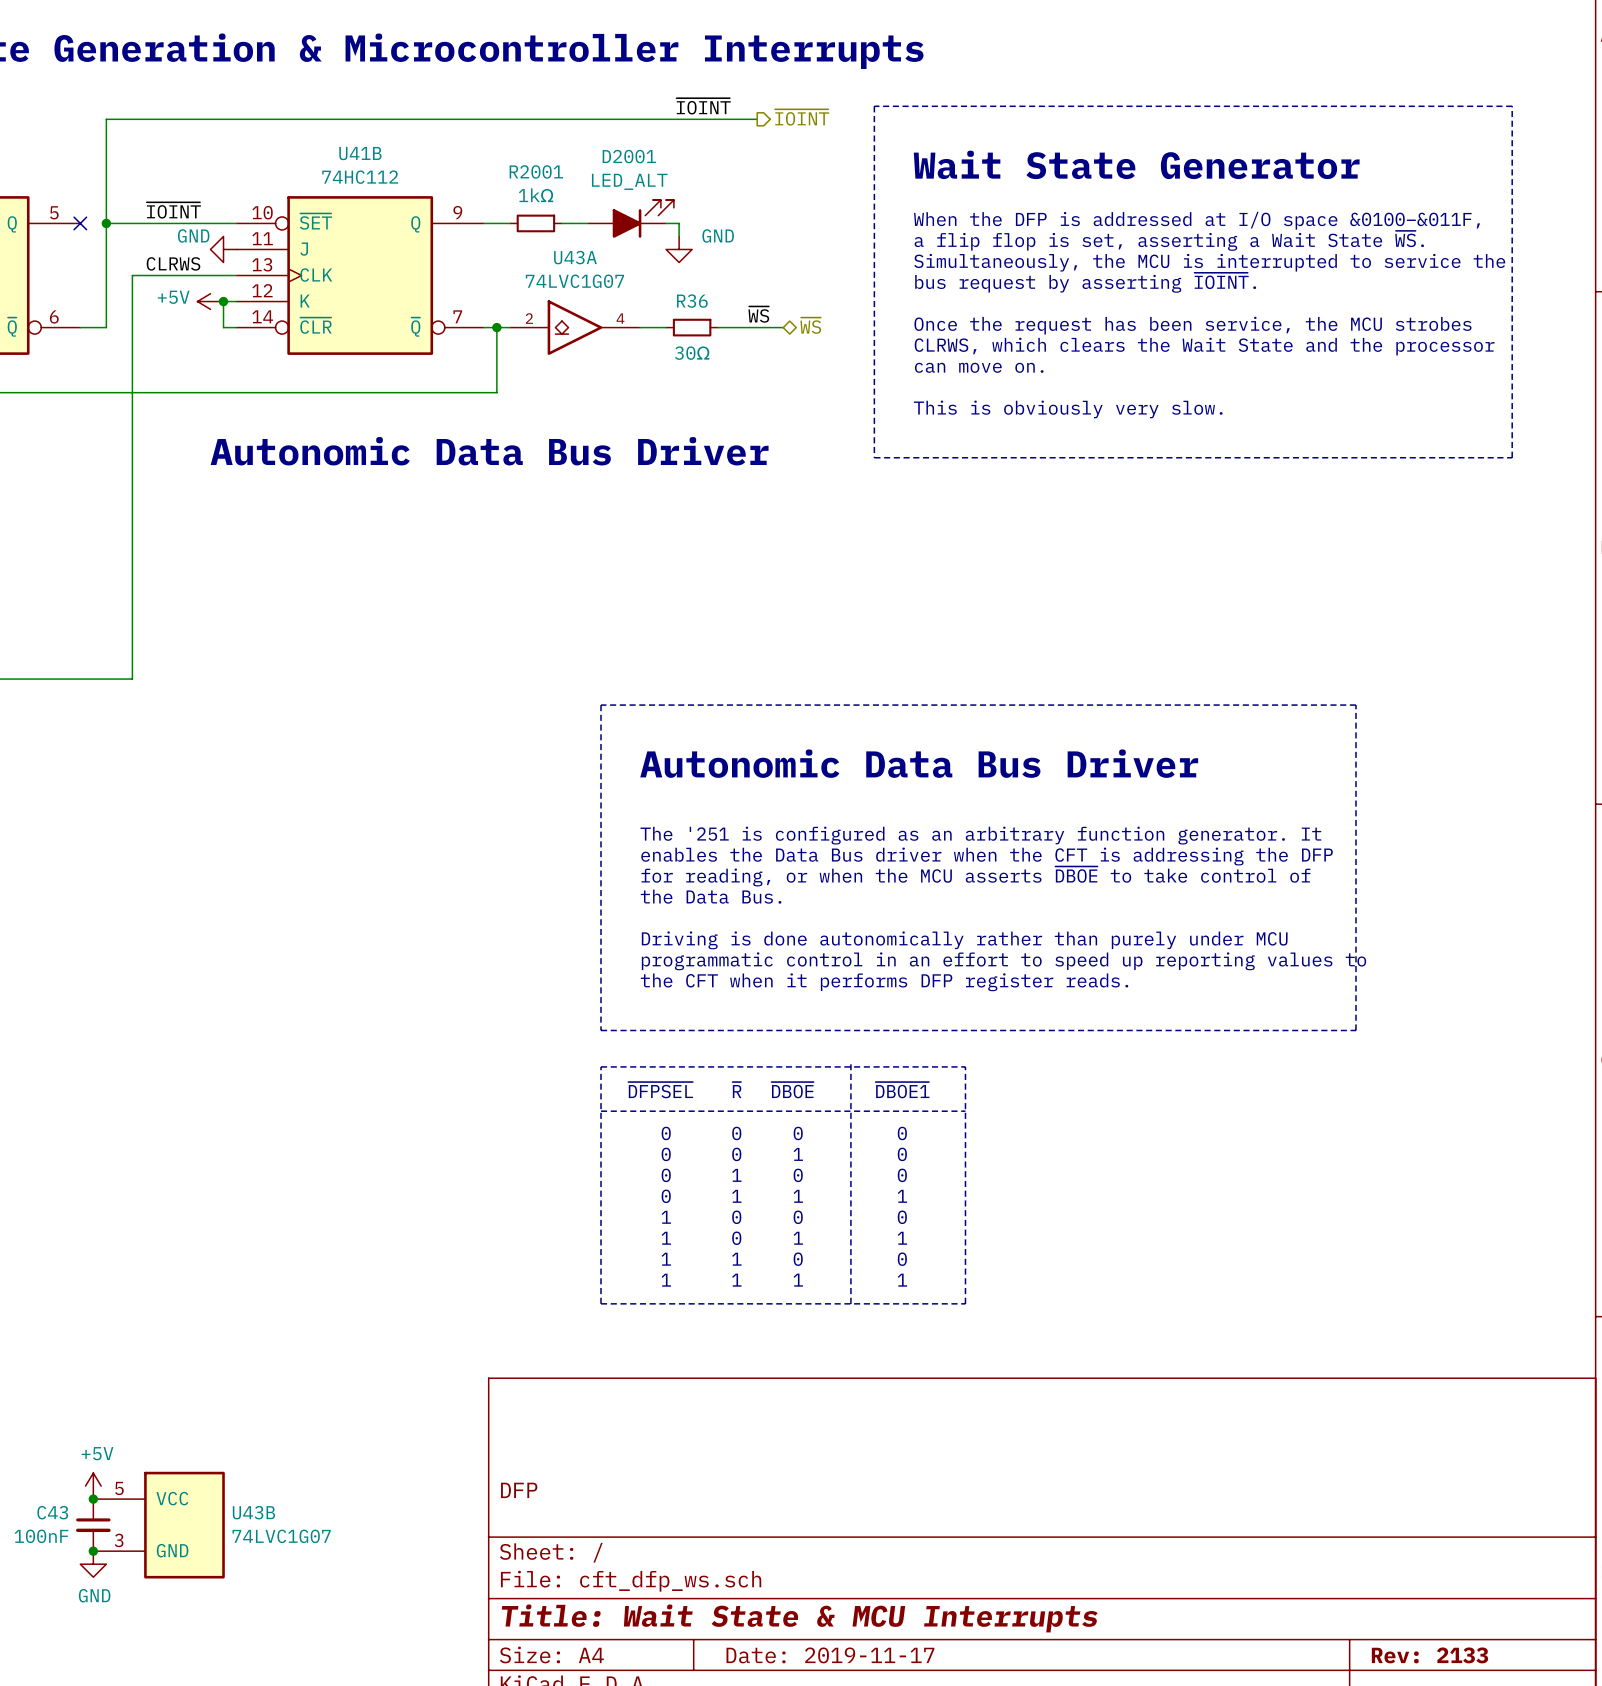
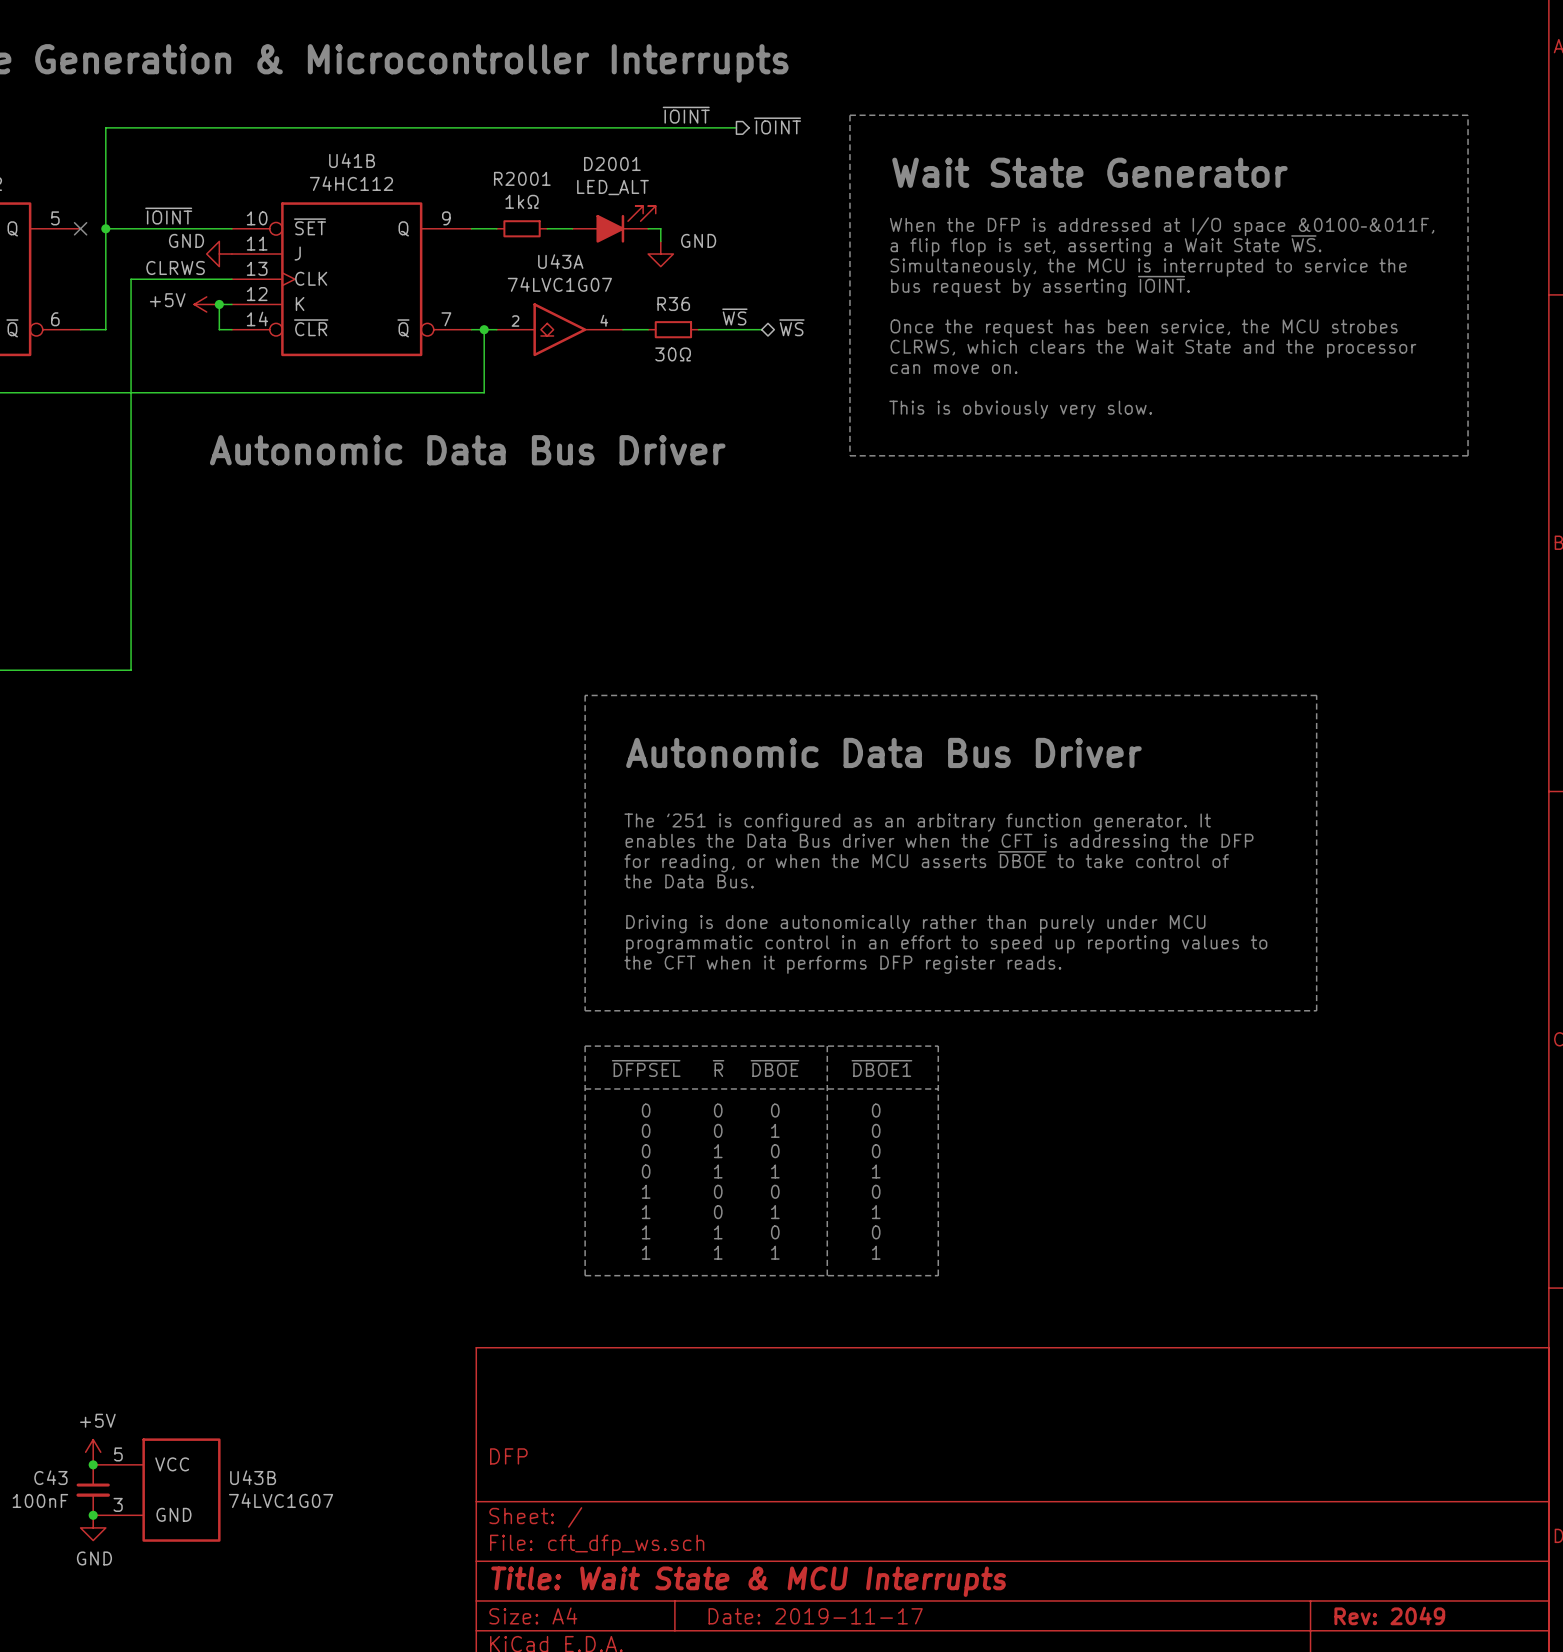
title block: Rev: 2133 (1429, 1655) -> Rev: 2049 (1389, 1615)

